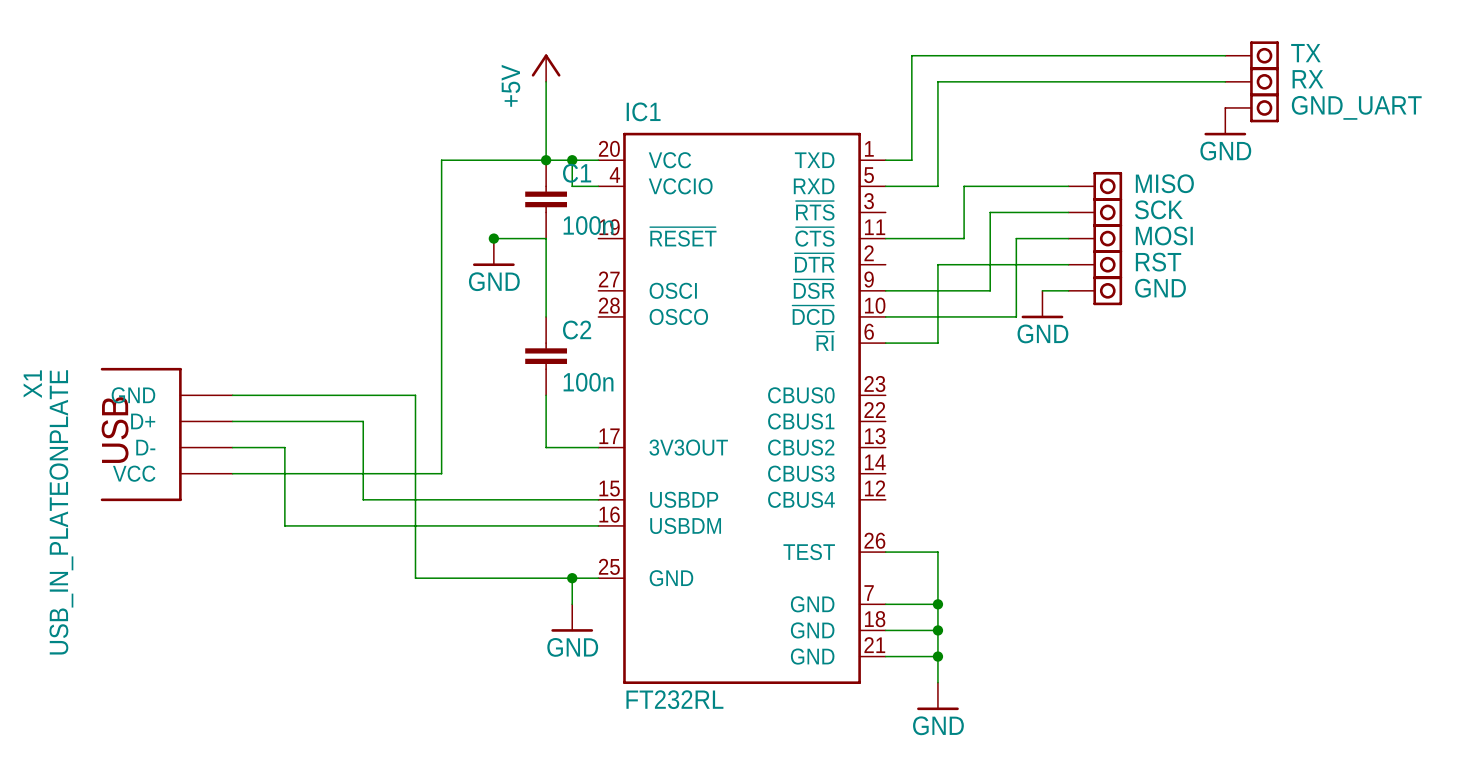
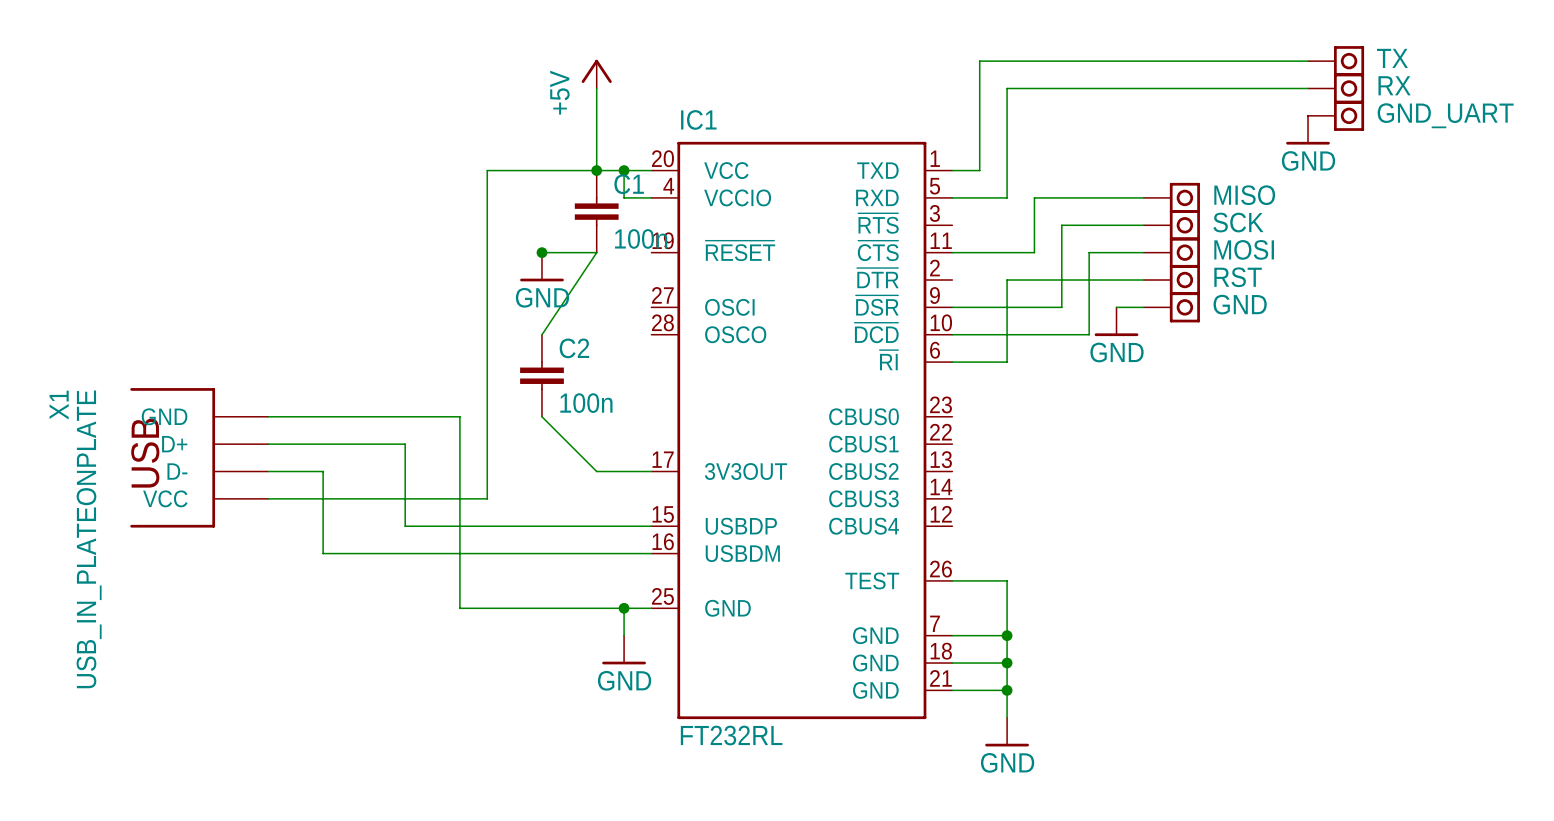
wire: (546, 238) (546, 316) -> (596, 252) (541, 334)
C2 position: (546, 356) -> (541, 375)
wire: (546, 395) (546, 447) -> (541, 416) (596, 471)

